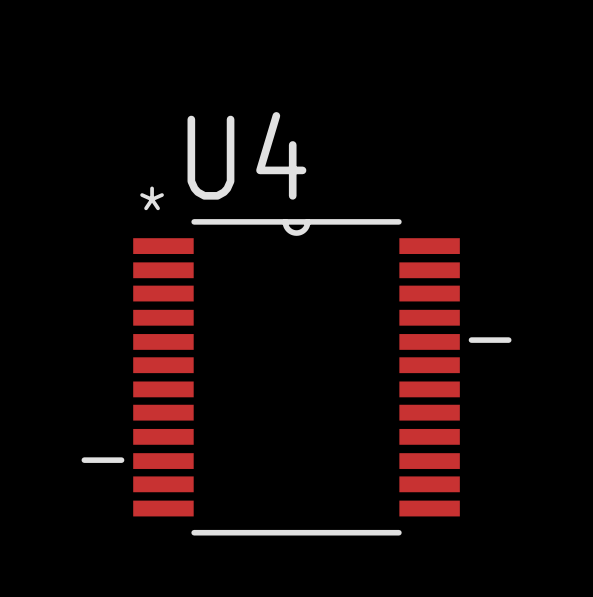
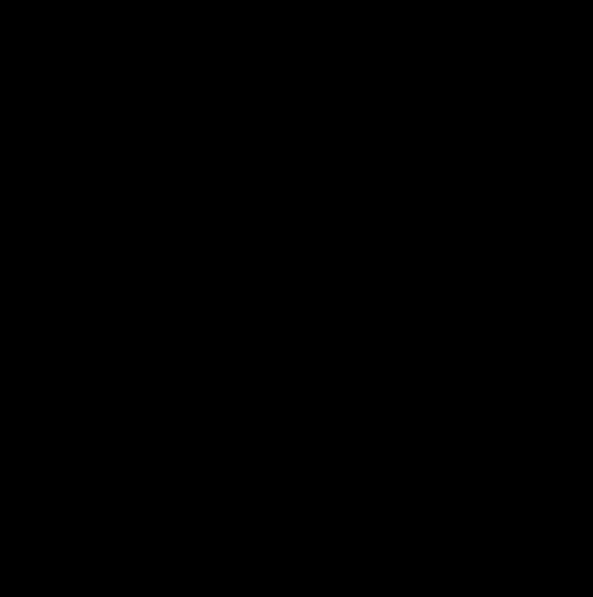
U4: (296, 377) -> none

